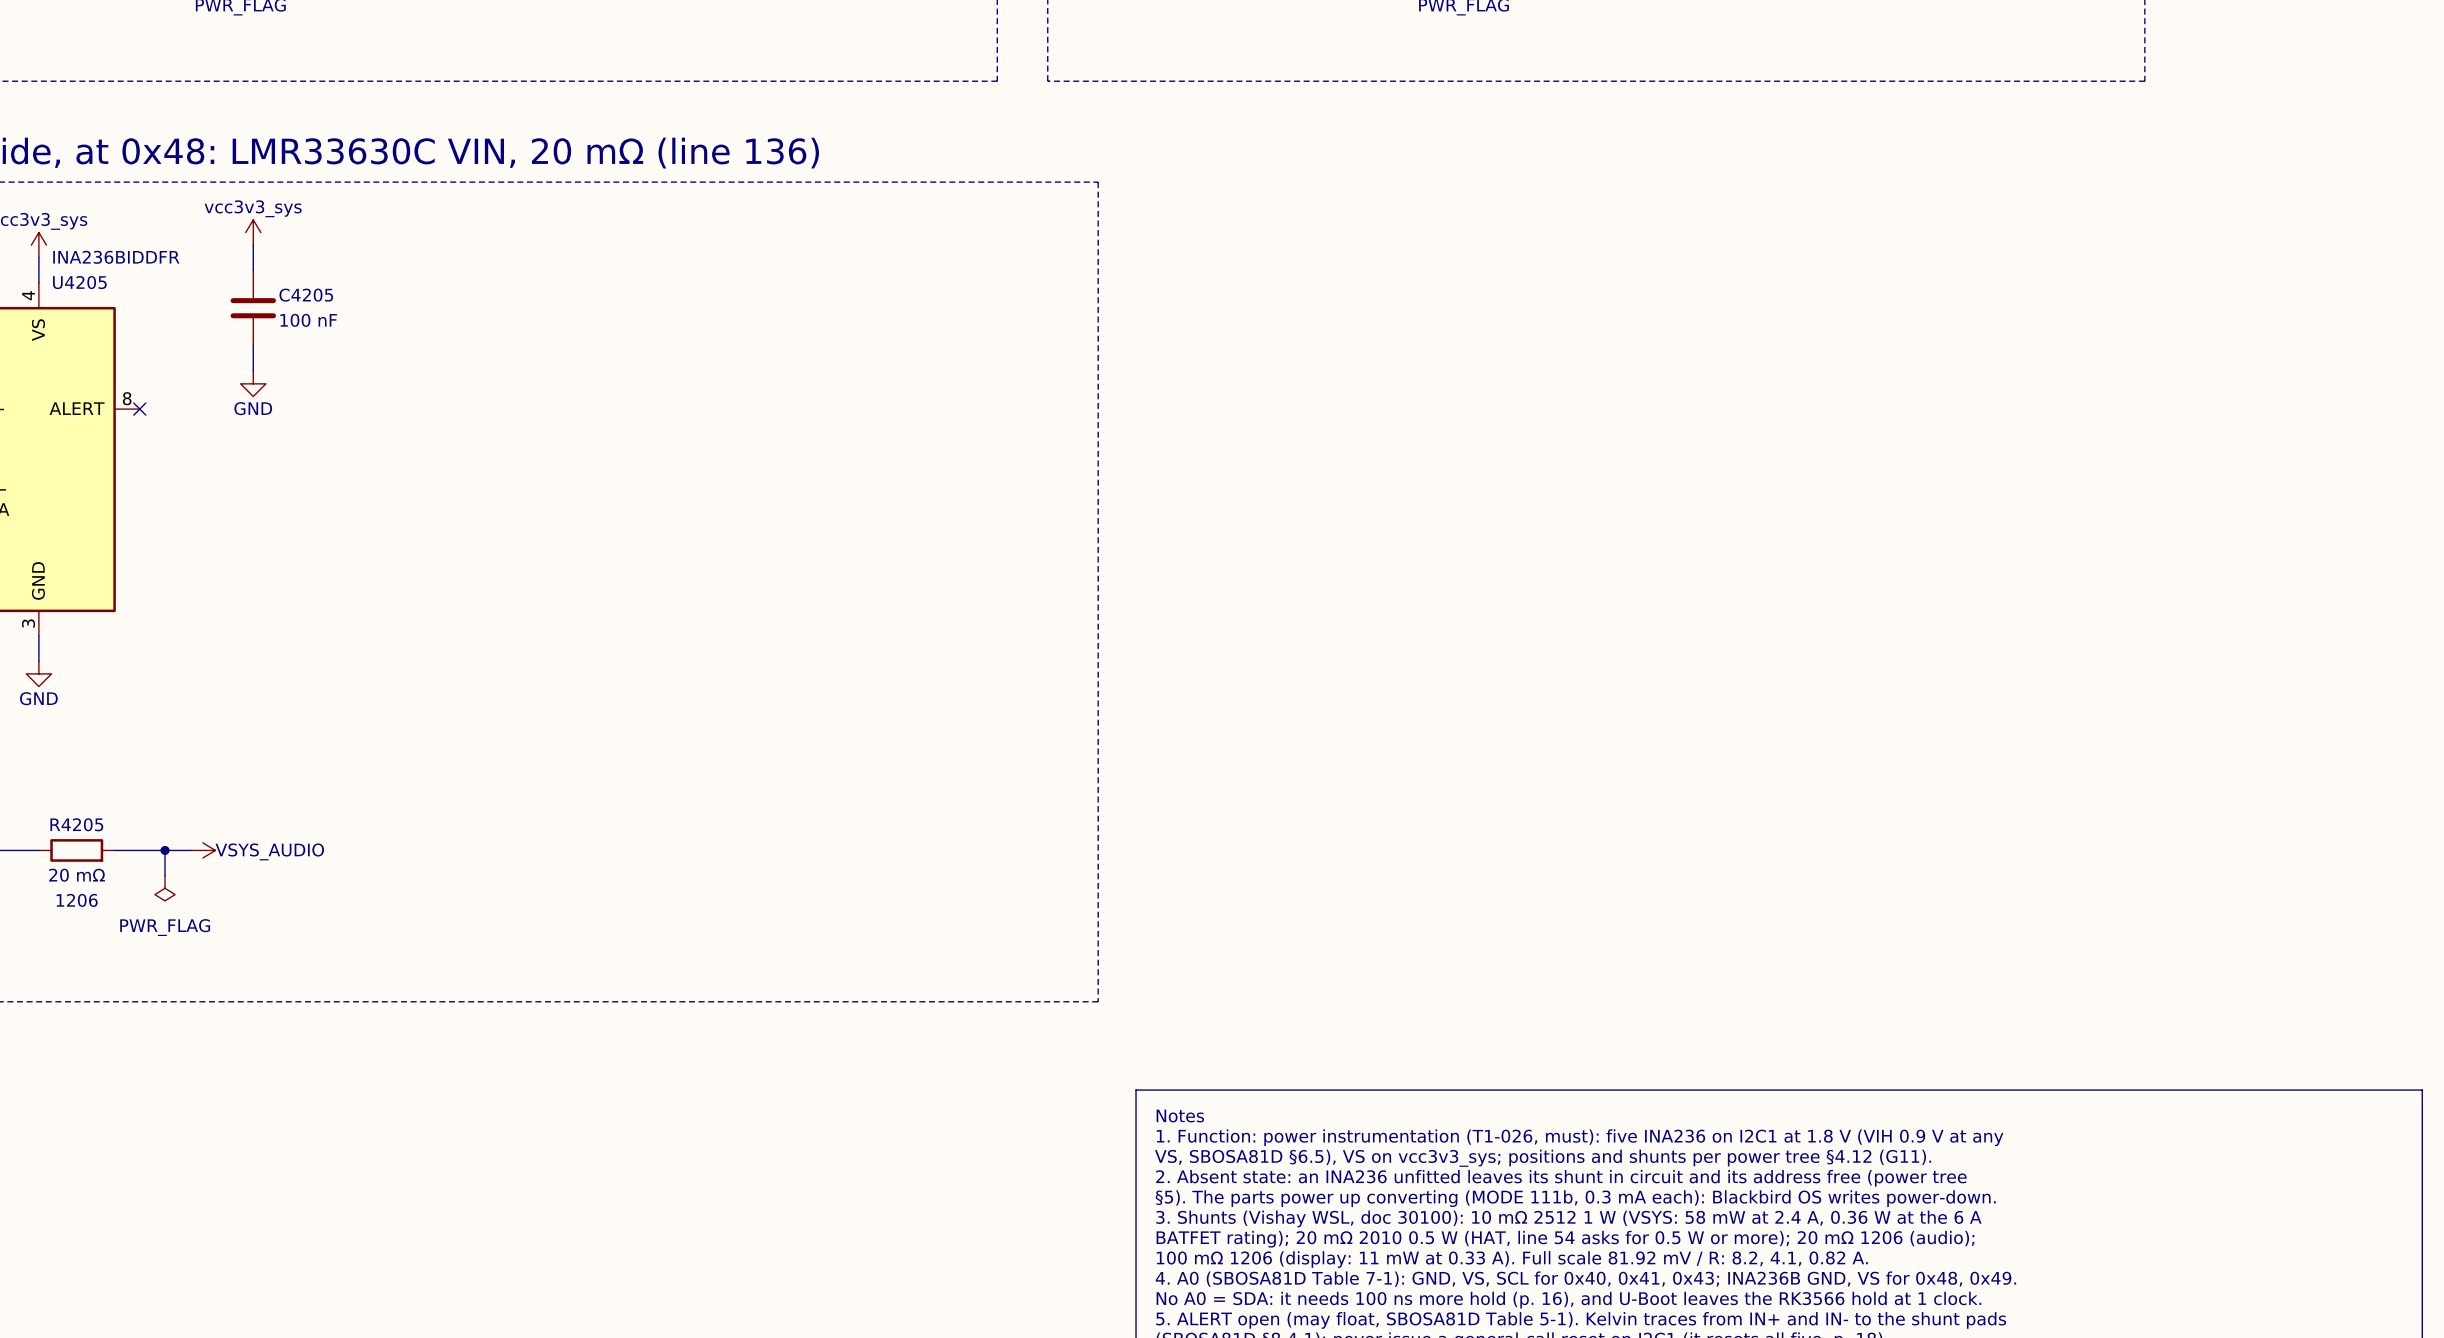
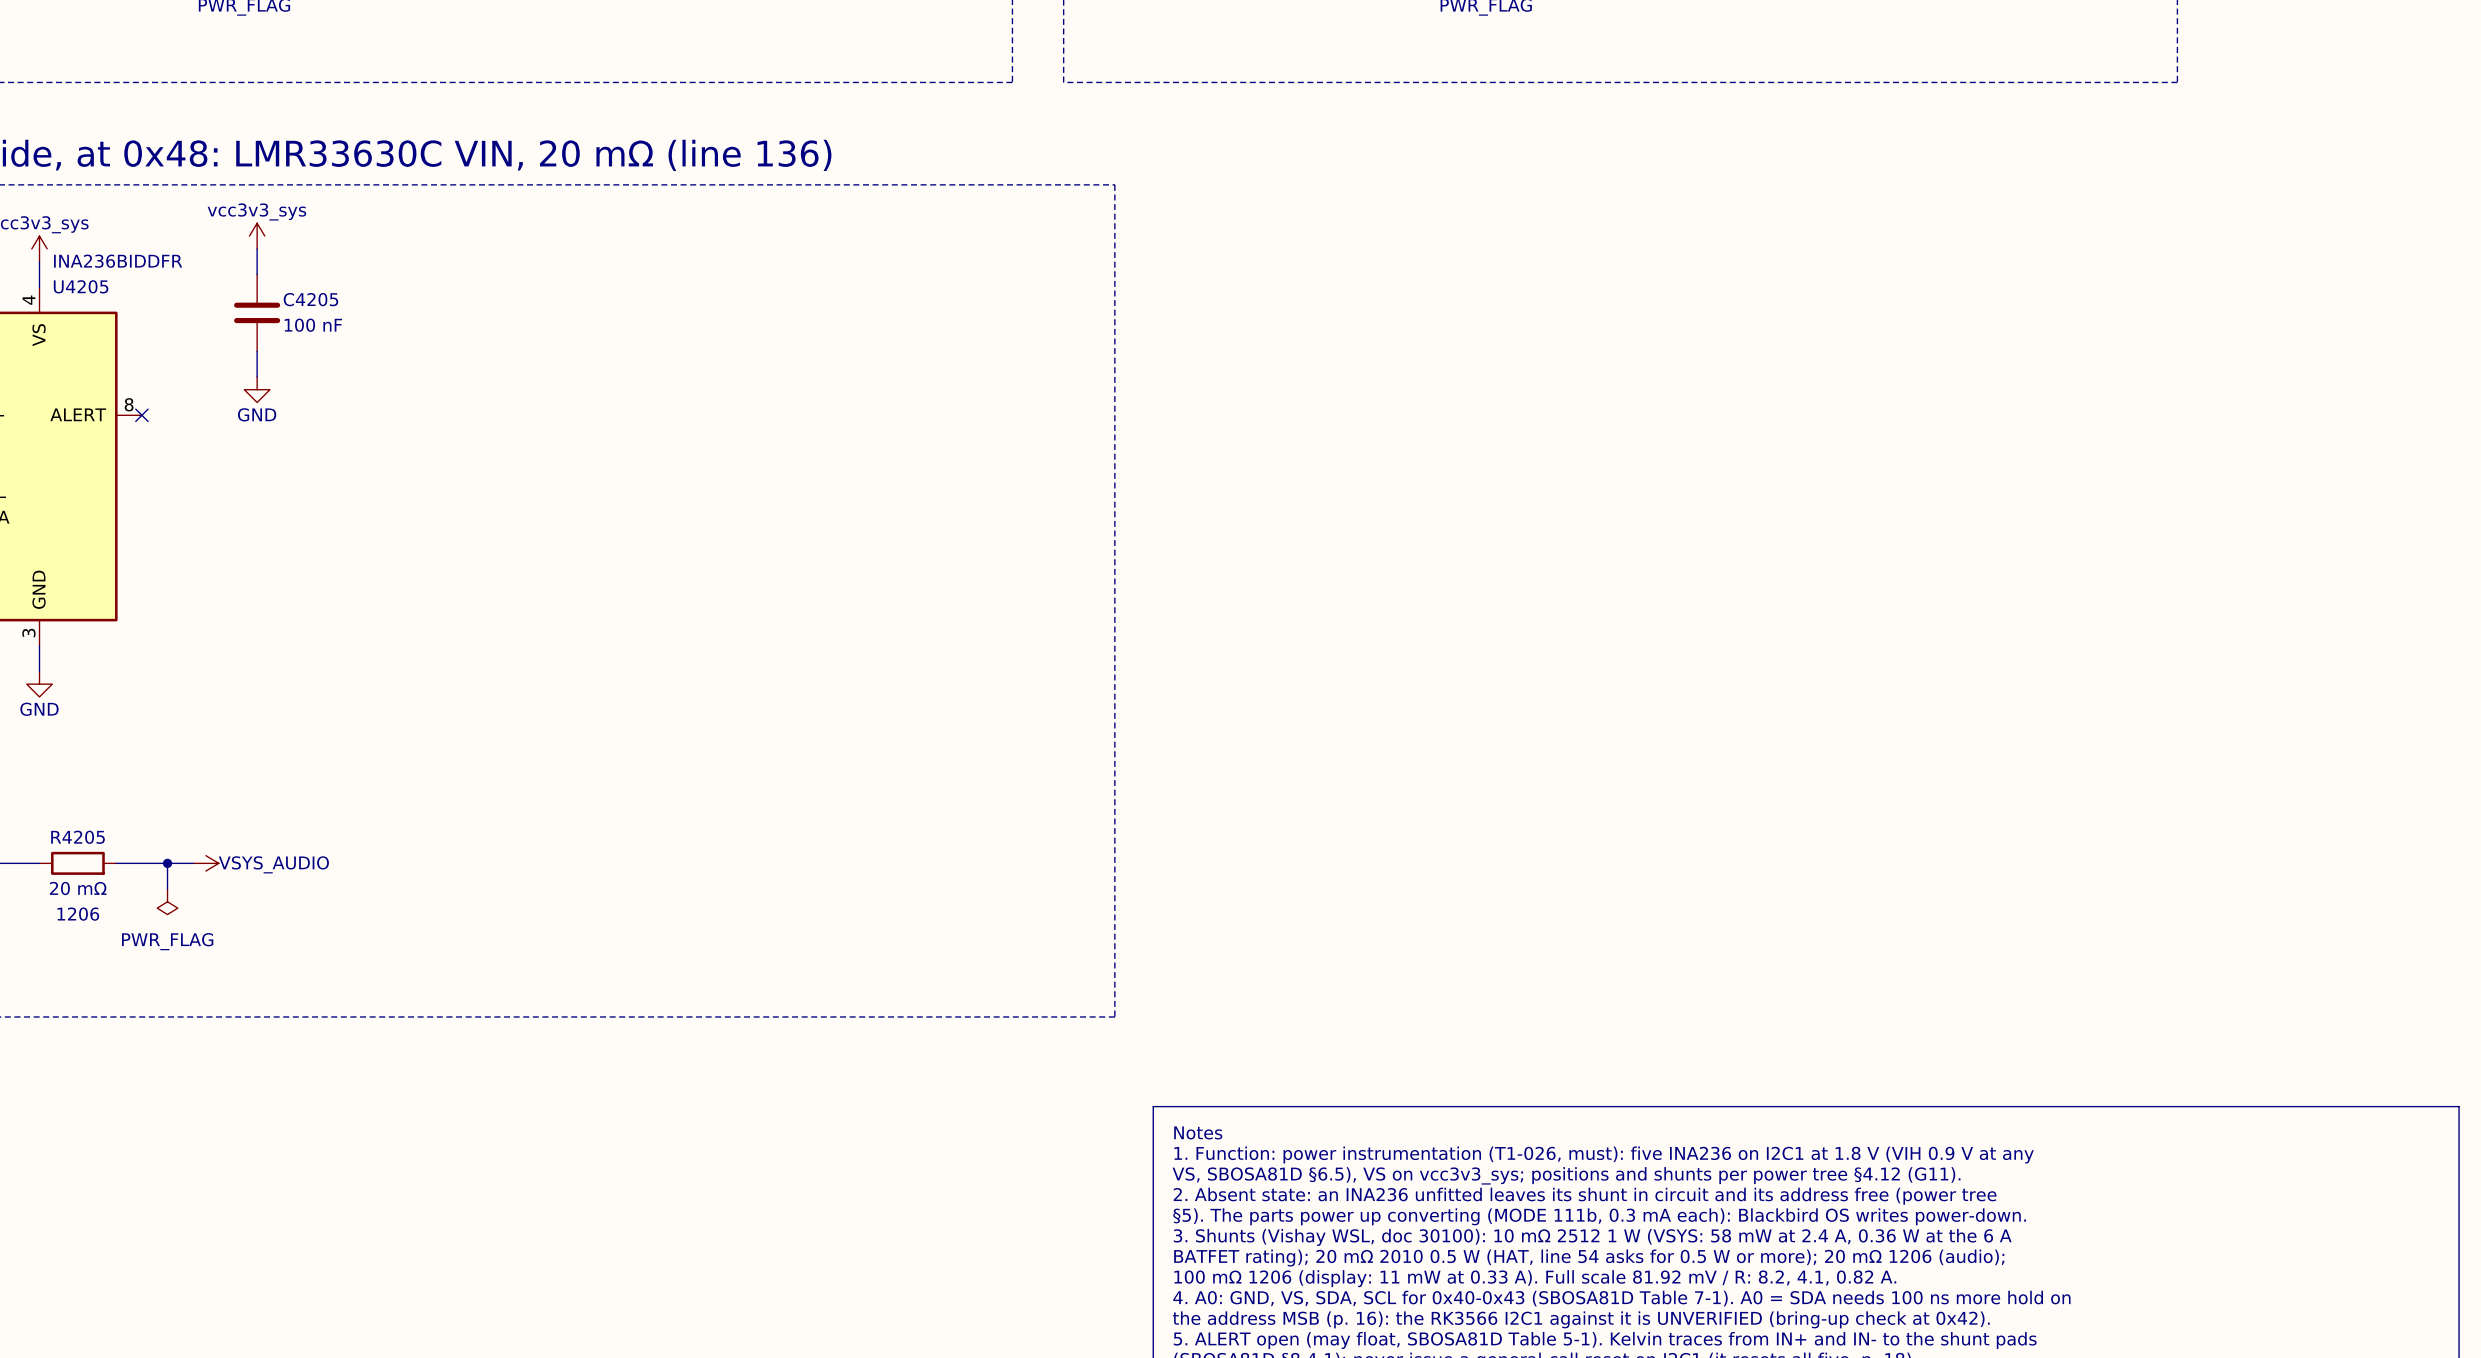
text: 4. A0 (SBOSA81D Table 7-1): GND, VS, SCL for 0x40, 0x41, 0x43; INA236B GND, VS for 0x48, 0x49. (1585, 1279) -> 4. A0: GND, VS, SDA, SCL for 0x40-0x43 (SBOSA81D Table 7-1). A0 = SDA needs 100 ns more hold on (1621, 1298)
text: No A0 = SDA: it needs 100 ns more hold (p. 16), and U-Boot leaves the RK3566 hold at 1 clock. (1568, 1300) -> the address MSB (p. 16): the RK3566 I2C1 against it is UNVERIFIED (bring-up check at 0x42). (1581, 1319)

